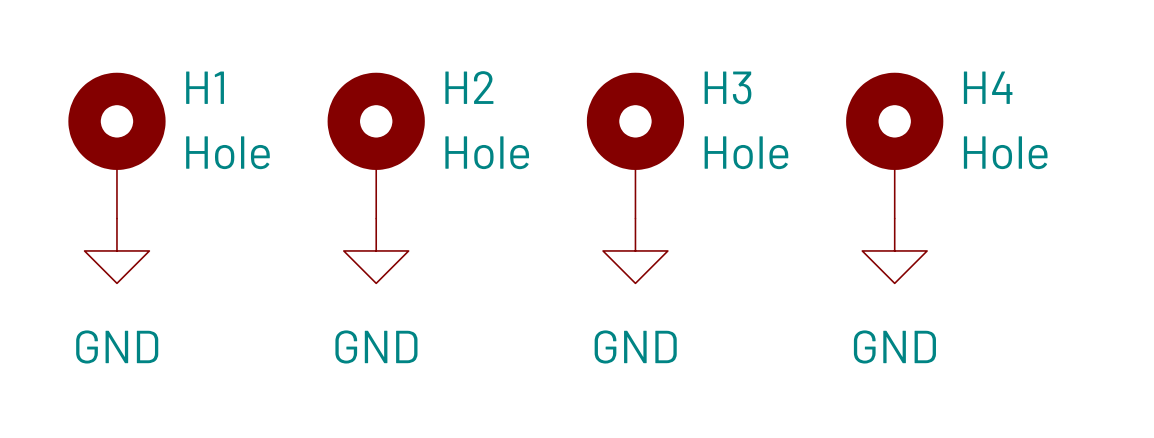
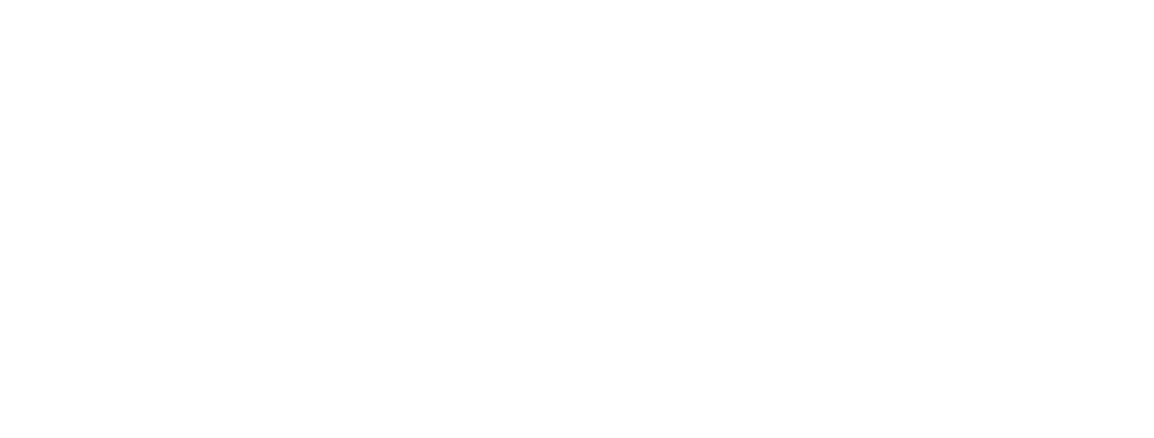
H1: Hole (116, 145) -> none
H2: Hole (376, 145) -> none
H3: Hole (635, 145) -> none
H4: Hole (894, 145) -> none
power symbol: GND (116, 250) -> none
power symbol: GND (376, 250) -> none
power symbol: GND (635, 250) -> none
power symbol: GND (894, 250) -> none

